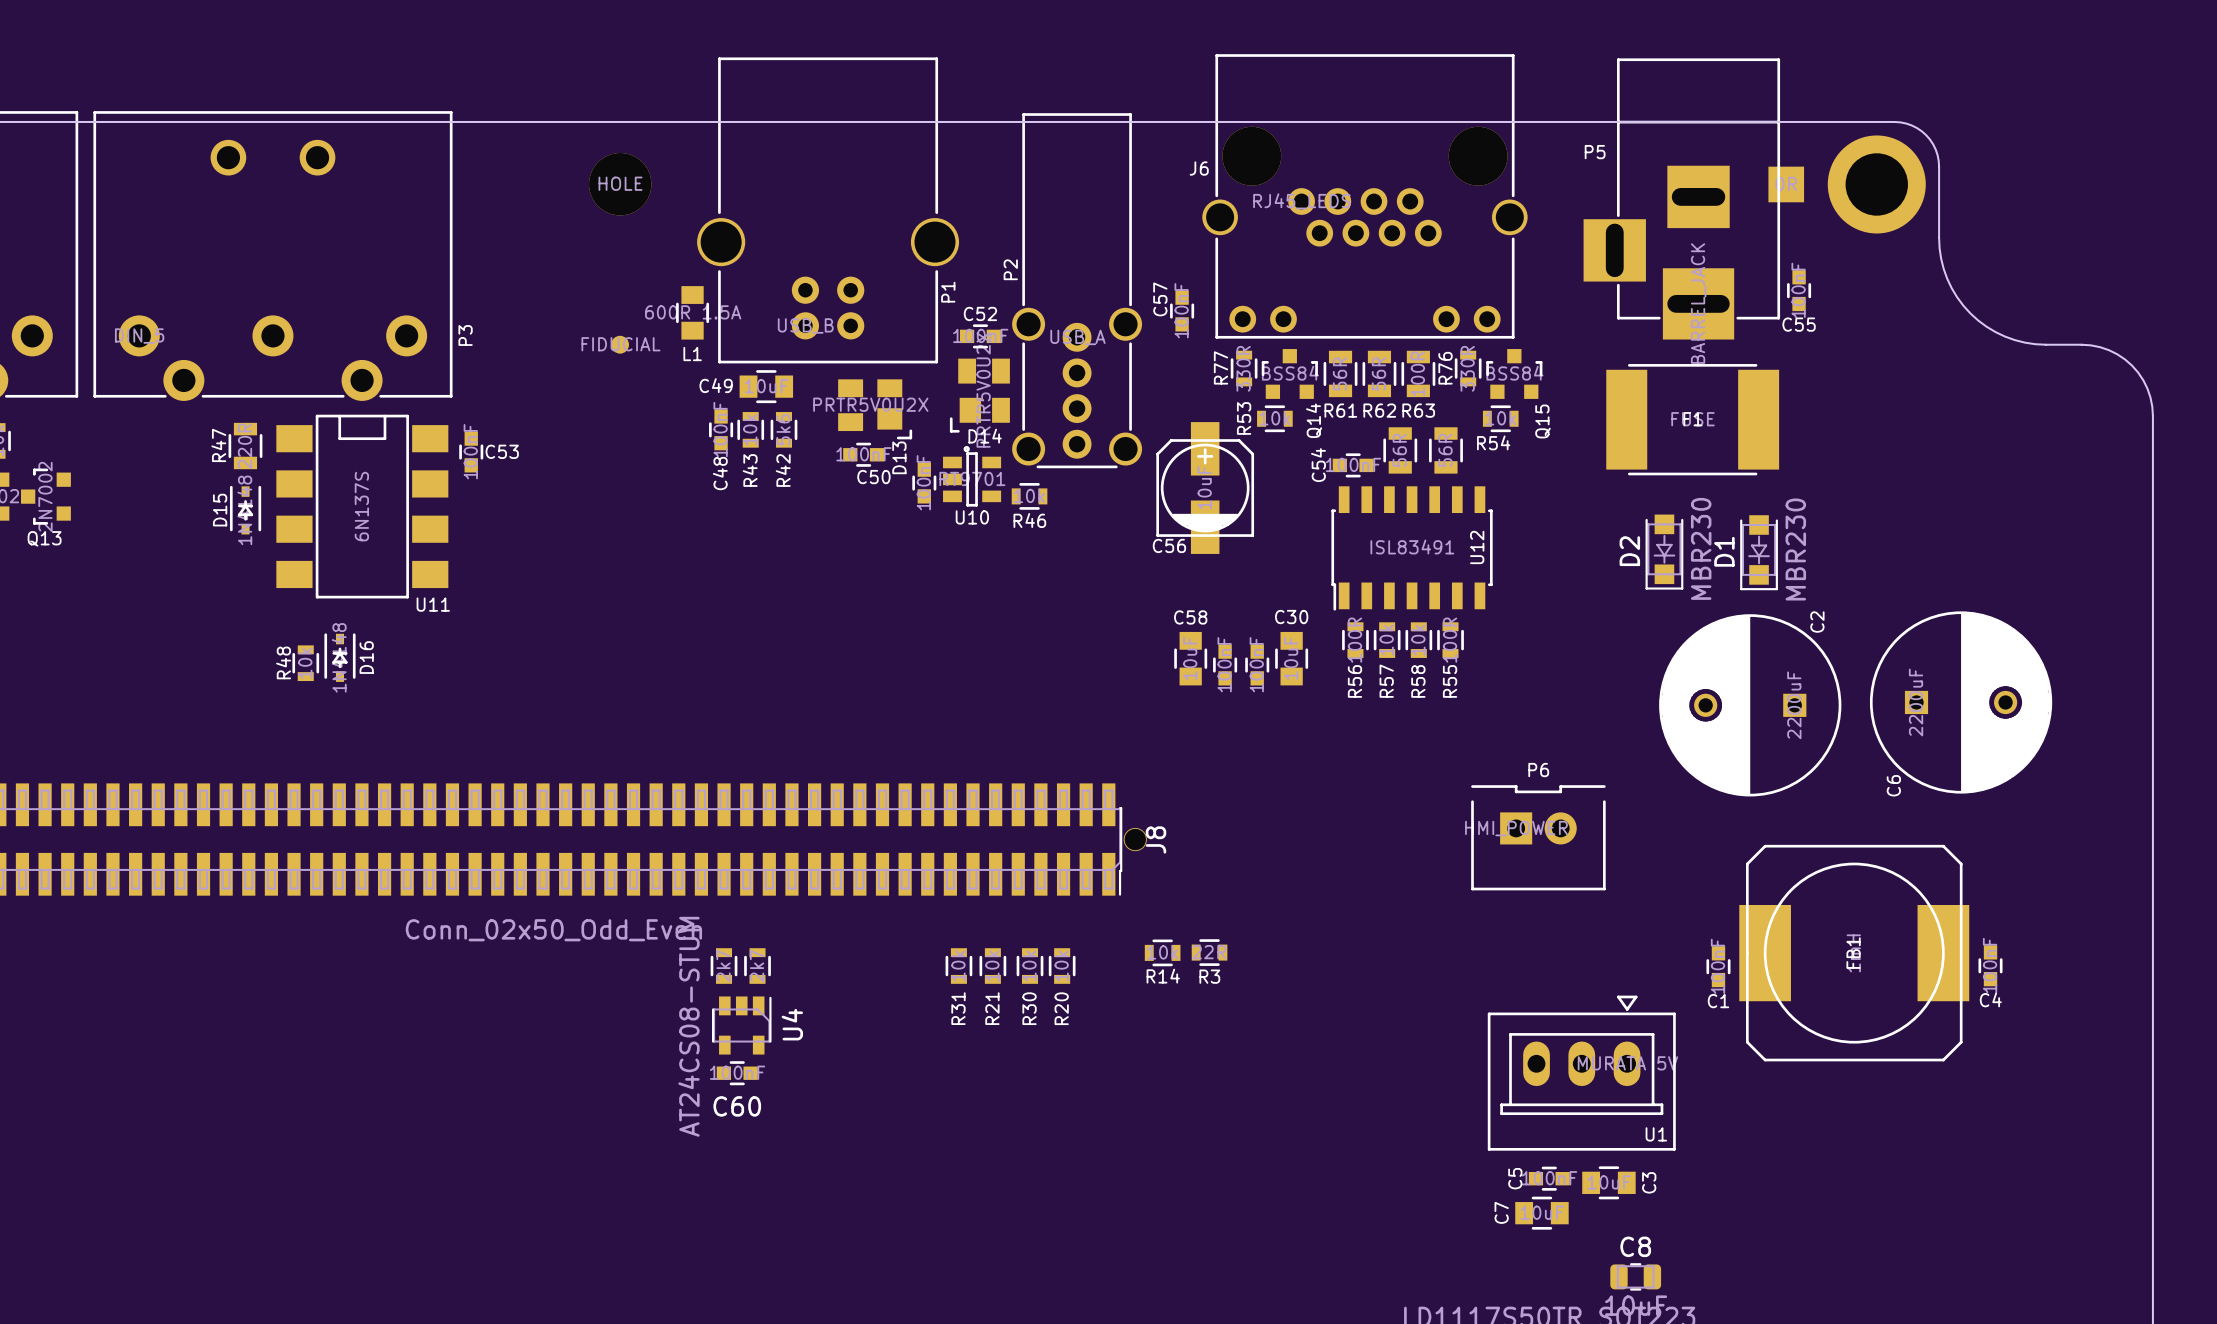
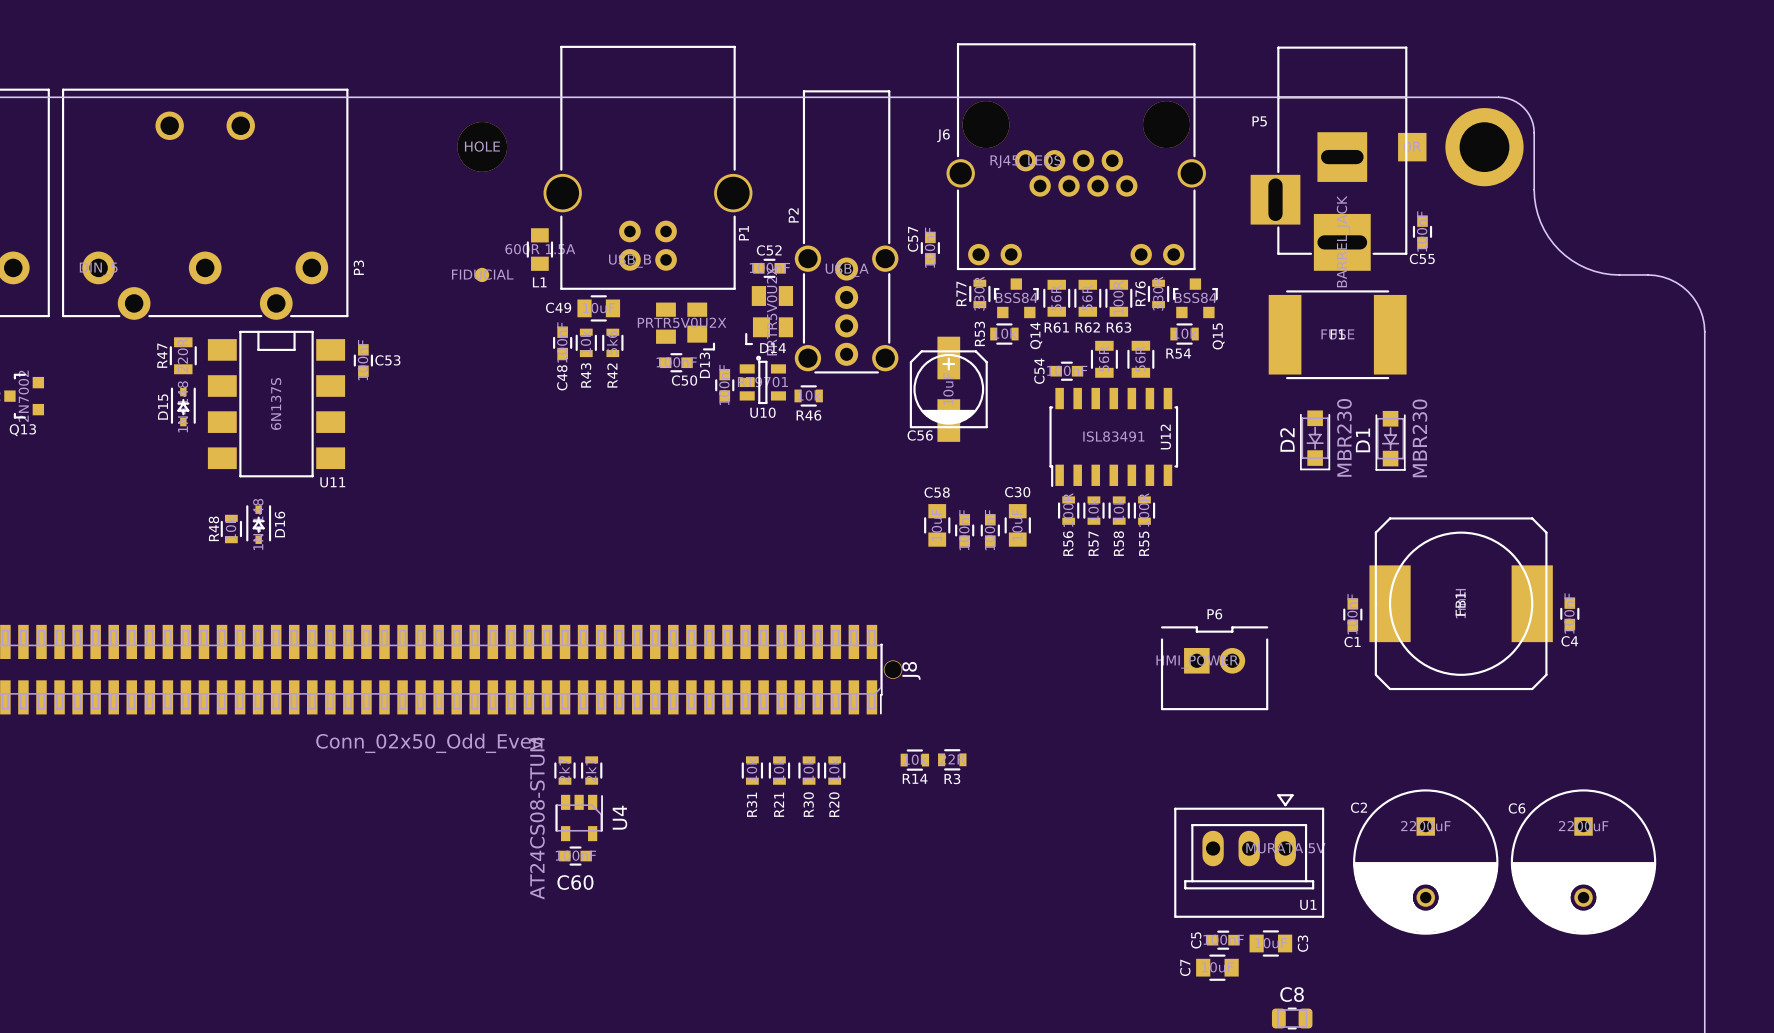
C6 rotation: 0° (1961, 702) -> 90° clockwise (1583, 862)
C6 position: (1961, 702) -> (1583, 862)
C2 rotation: 0° (1750, 705) -> 90° counterclockwise (1425, 862)
C2 position: (1750, 705) -> (1425, 862)
FB1 position: (1854, 953) -> (1461, 603)
C4 position: (1990, 965) -> (1569, 613)
C1 position: (1718, 966) -> (1352, 614)

